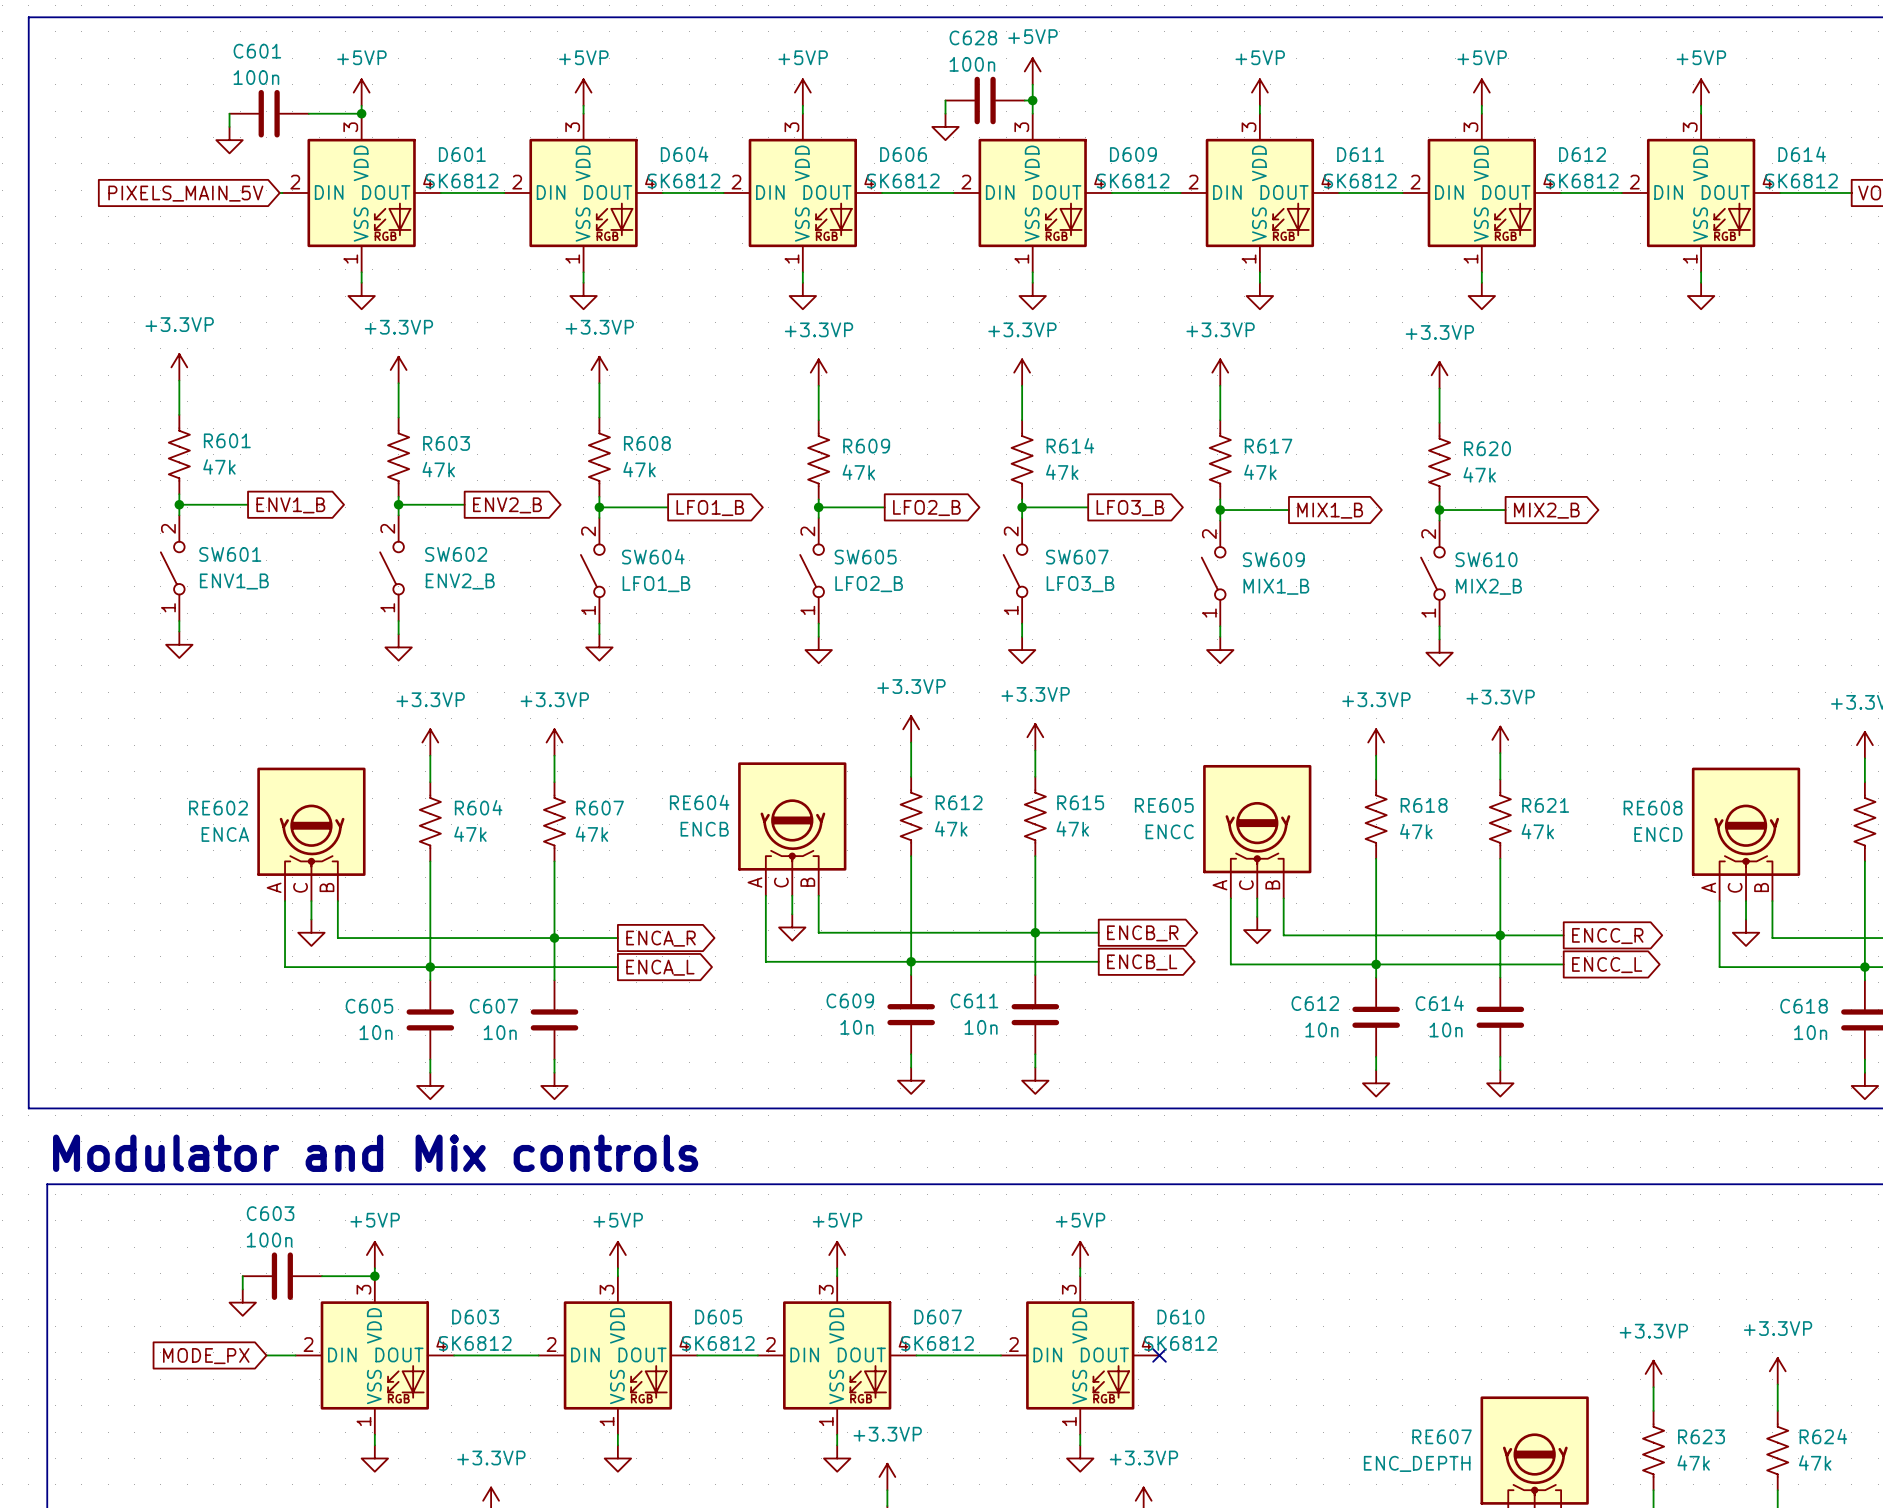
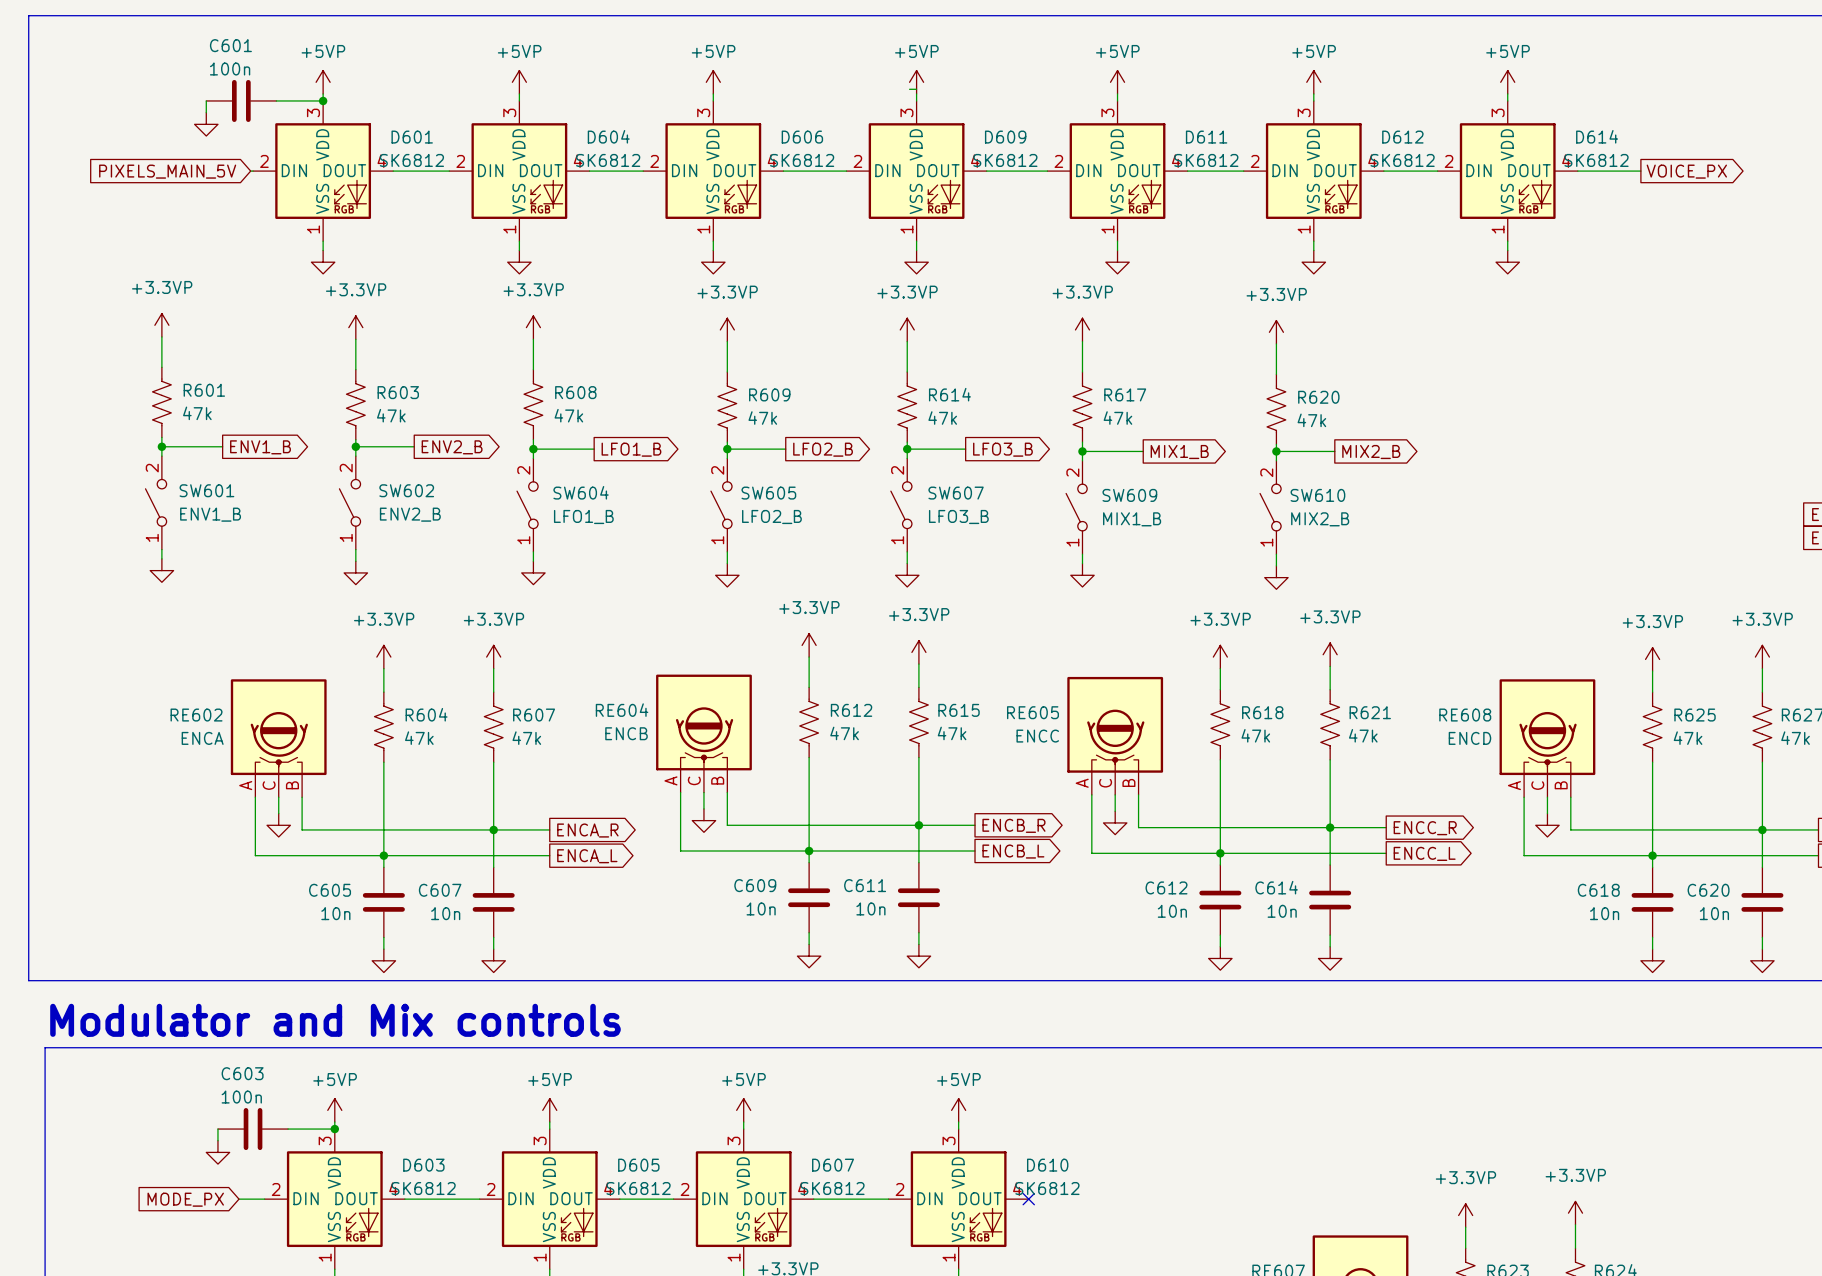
power symbol position: +5VP (1032, 71) -> +5VP (916, 82)
wire: (945, 100) (945, 113) -> none
C628: 100n (985, 100) -> none
junction: (1032, 100) -> none
power symbol: (945, 126) -> none

